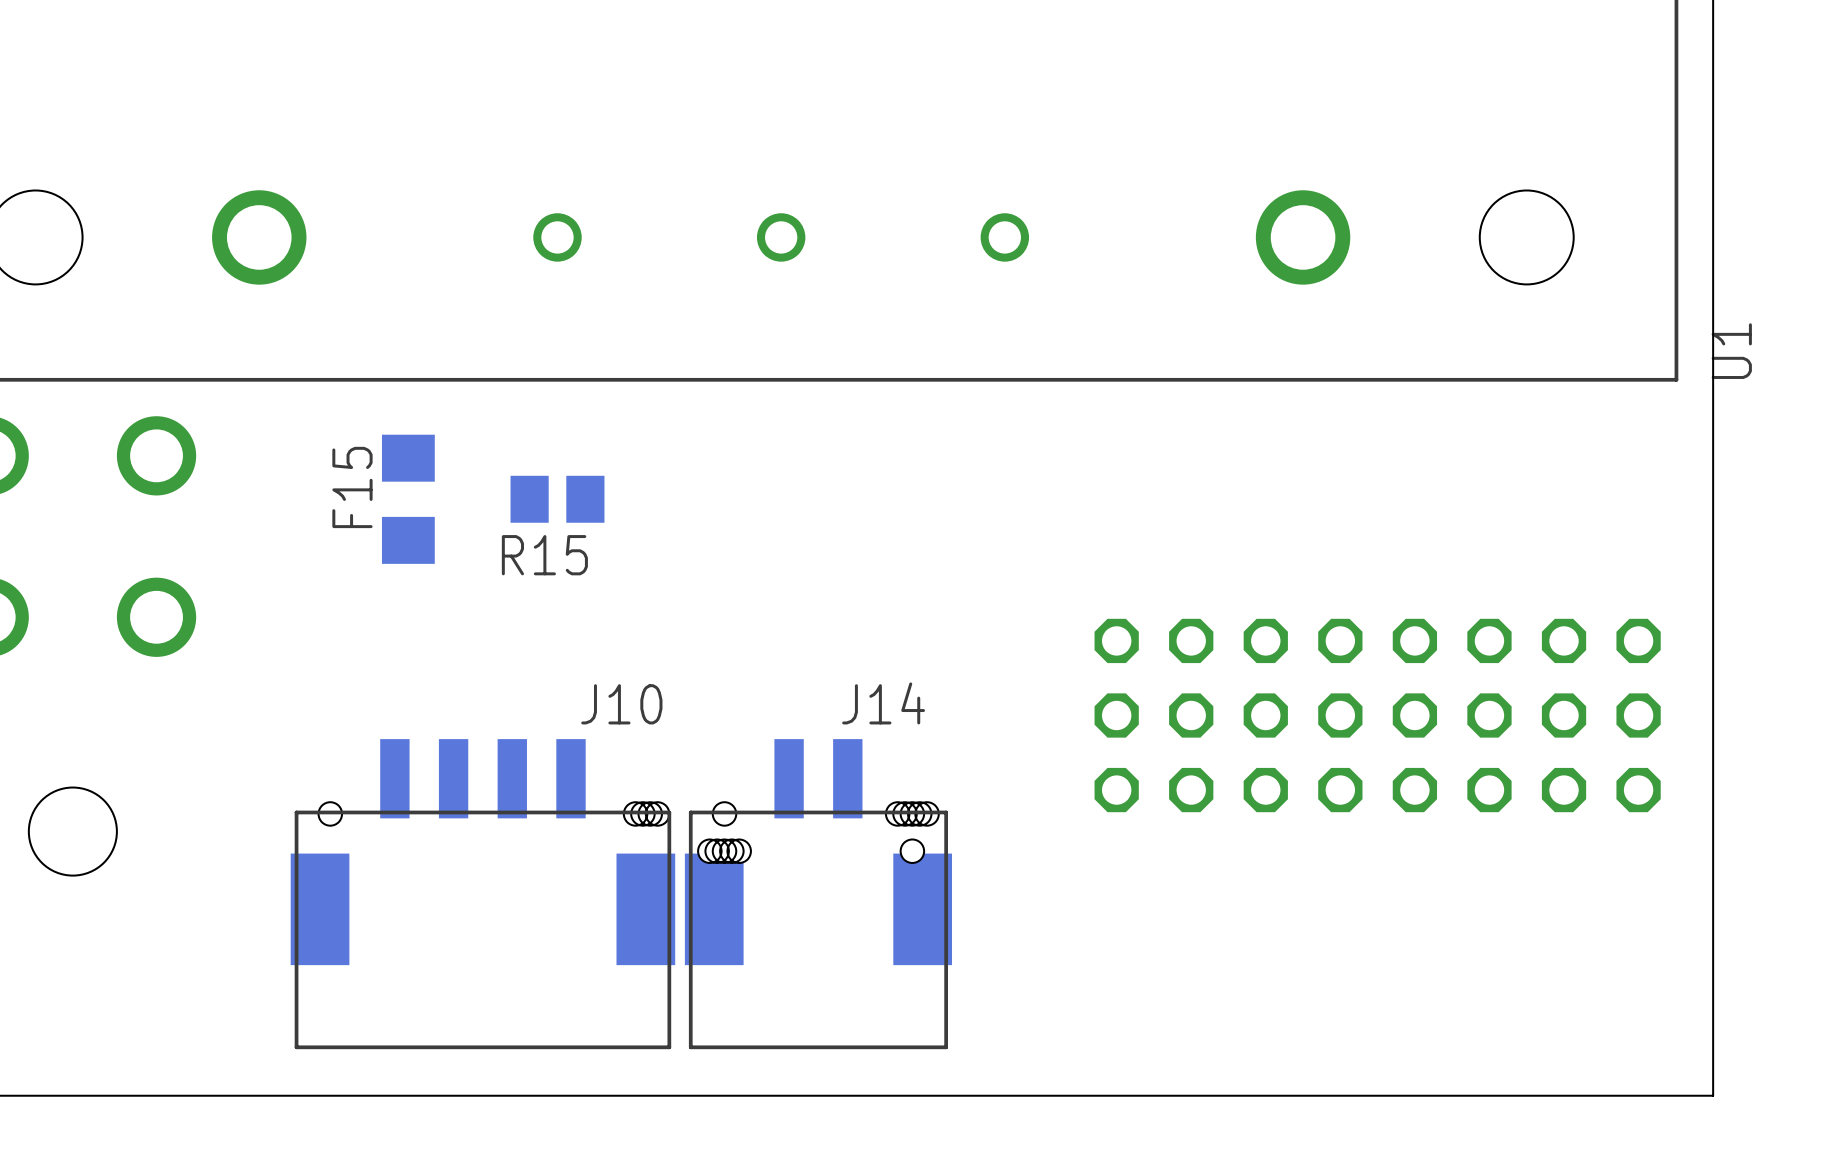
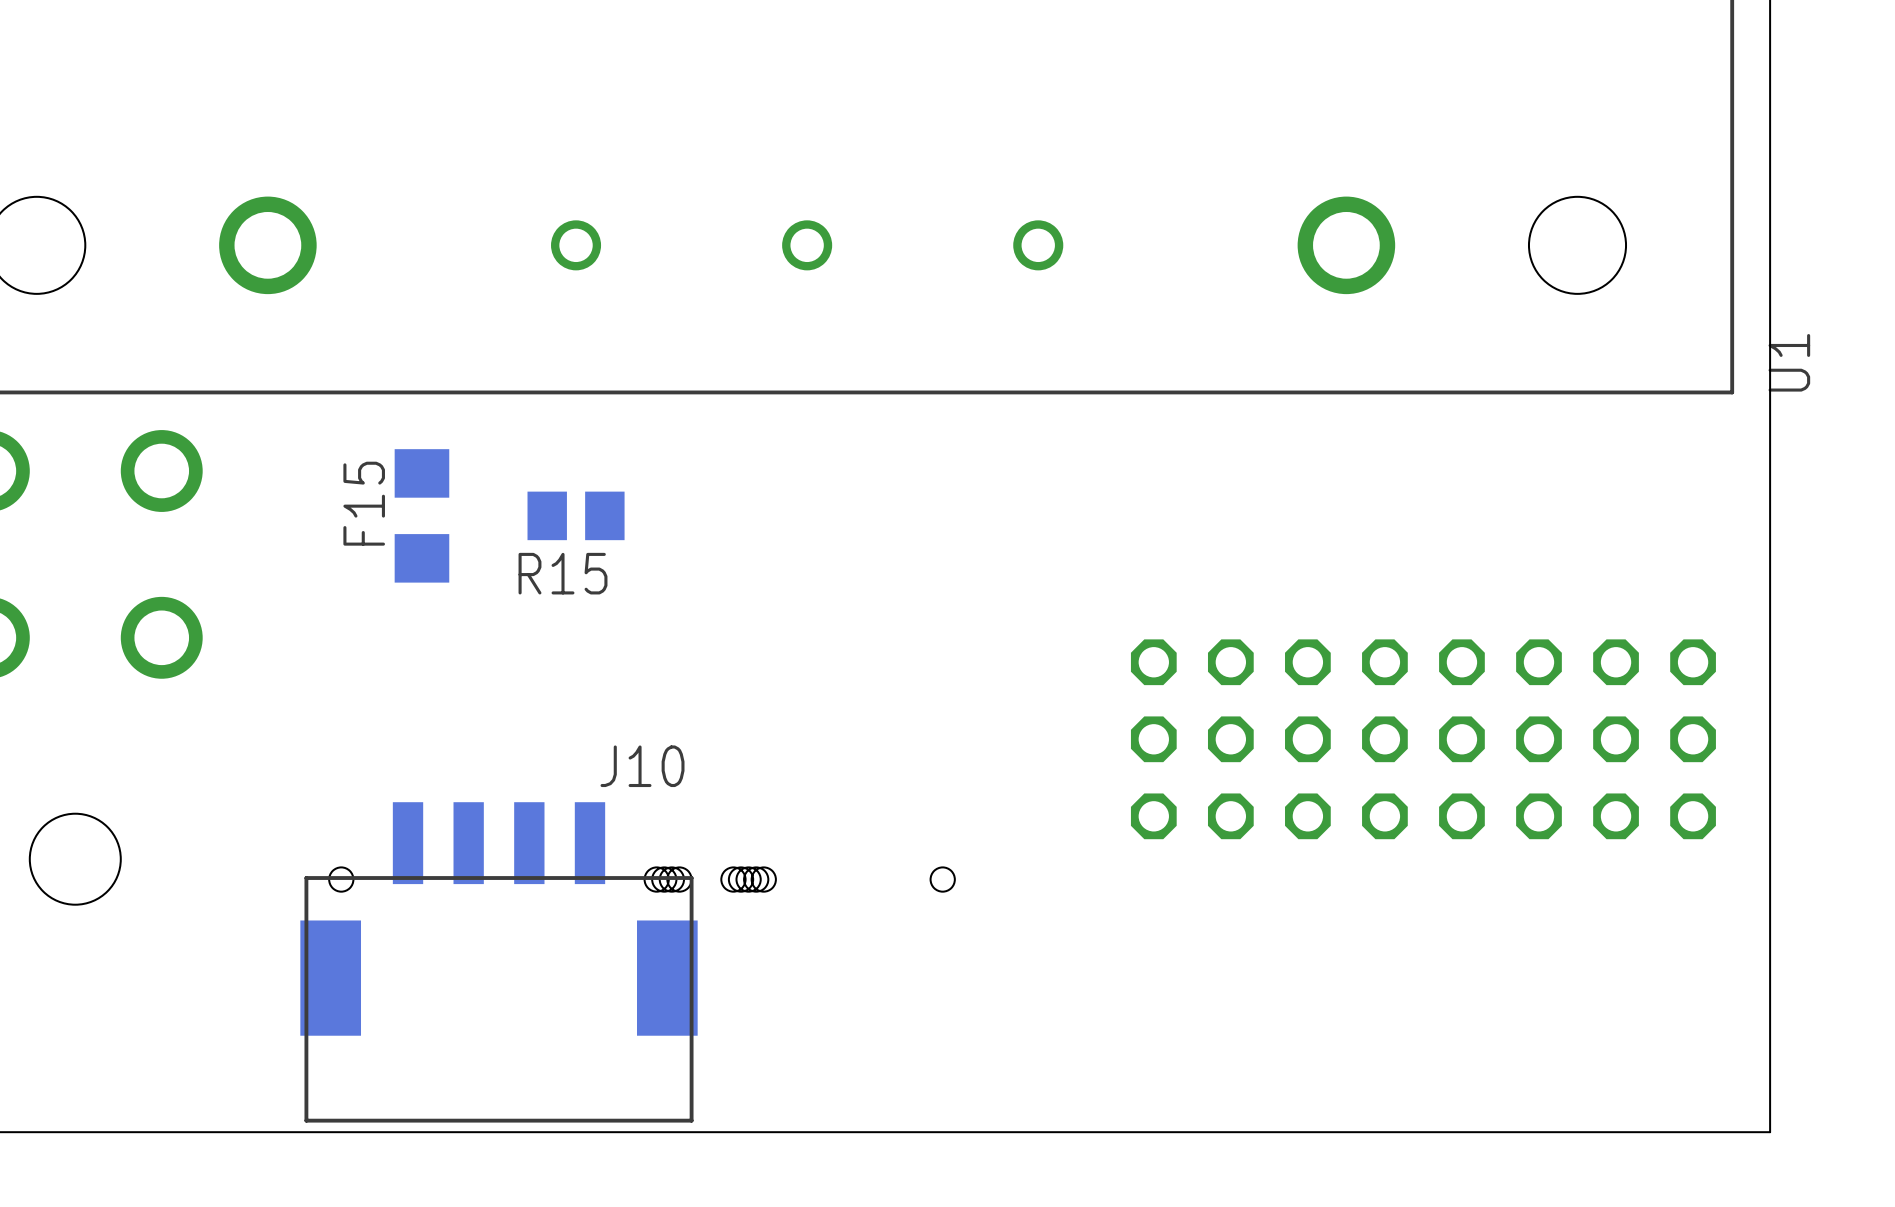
J10 position: (482, 894) -> (499, 962)
J14: (818, 894) -> none

